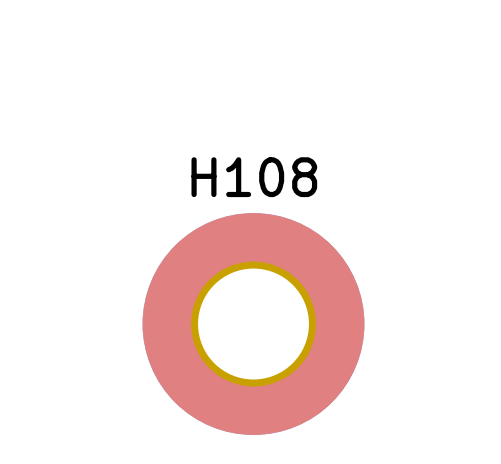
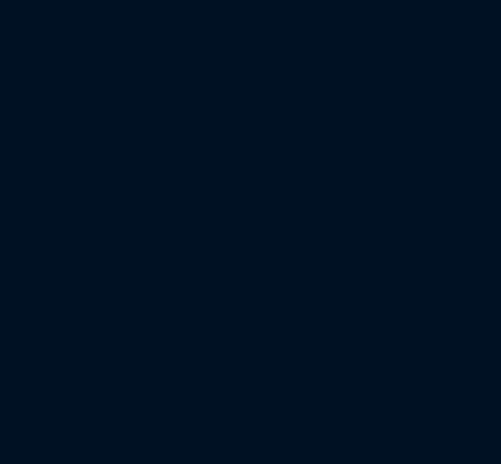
H108: (253, 324) -> none

